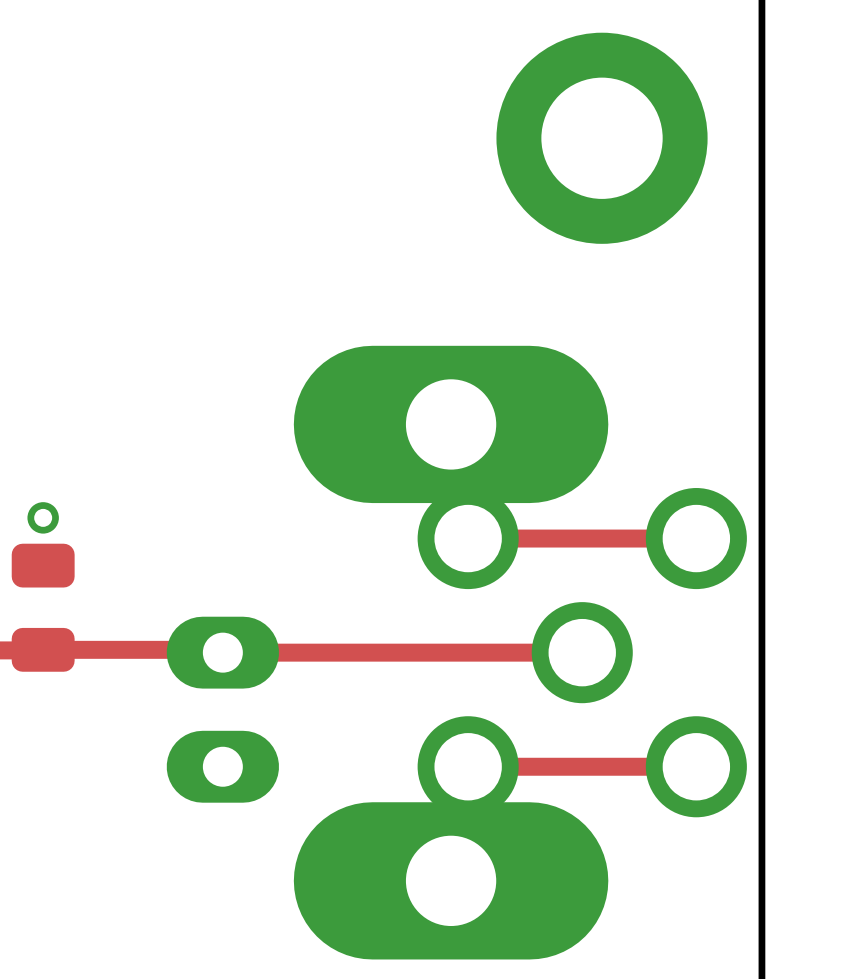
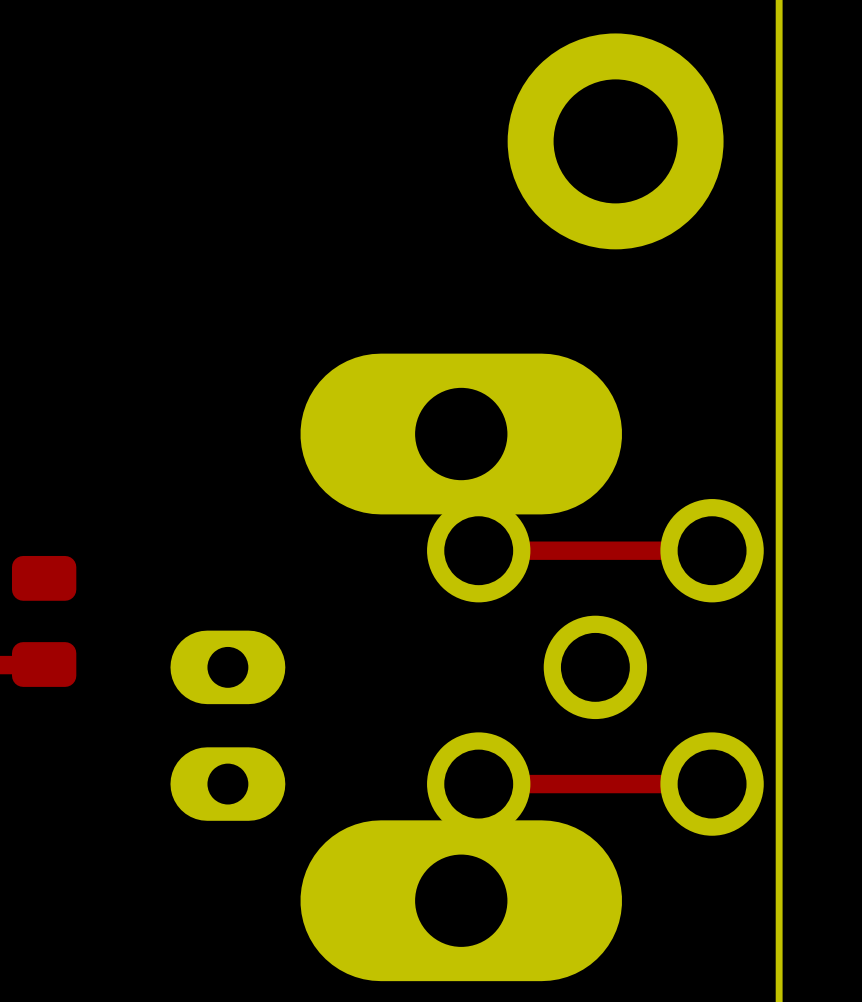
via: (43, 517) -> none
top track: (43, 649) (220, 649) (222, 652) (582, 652) -> none

